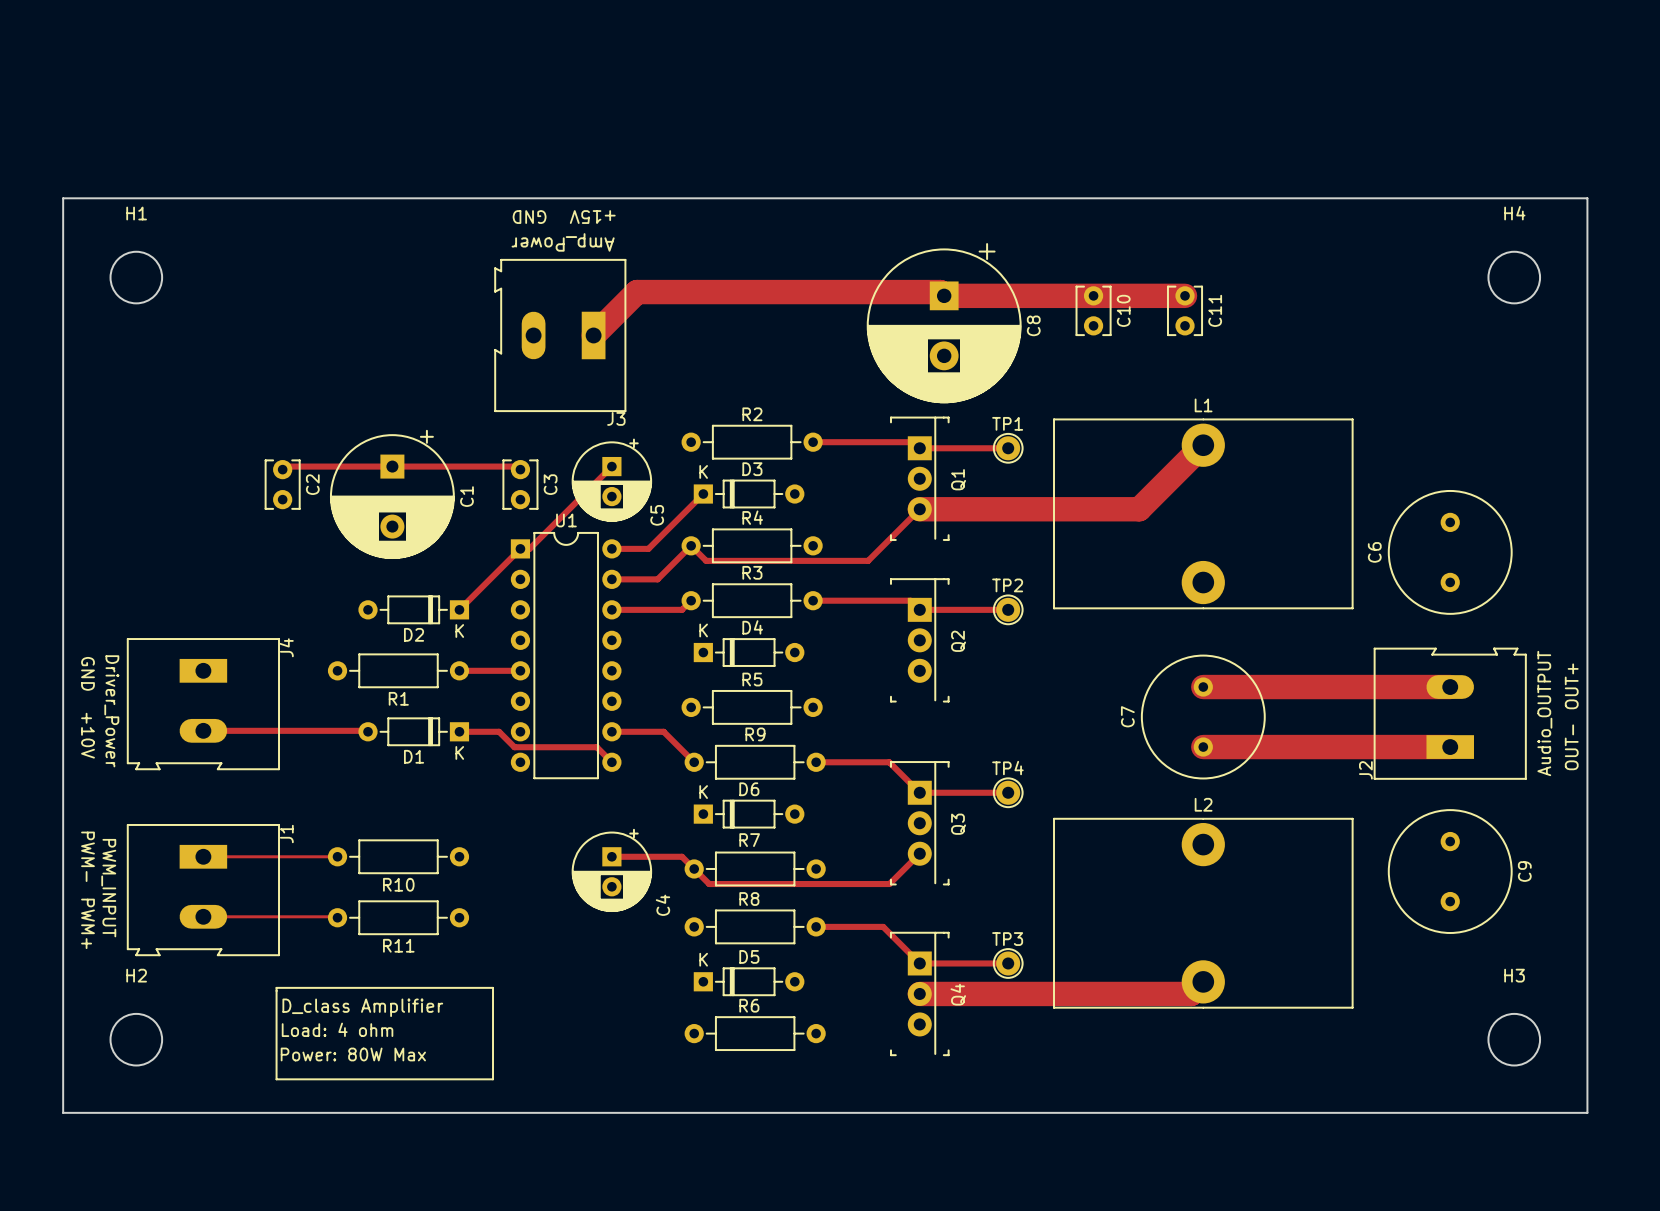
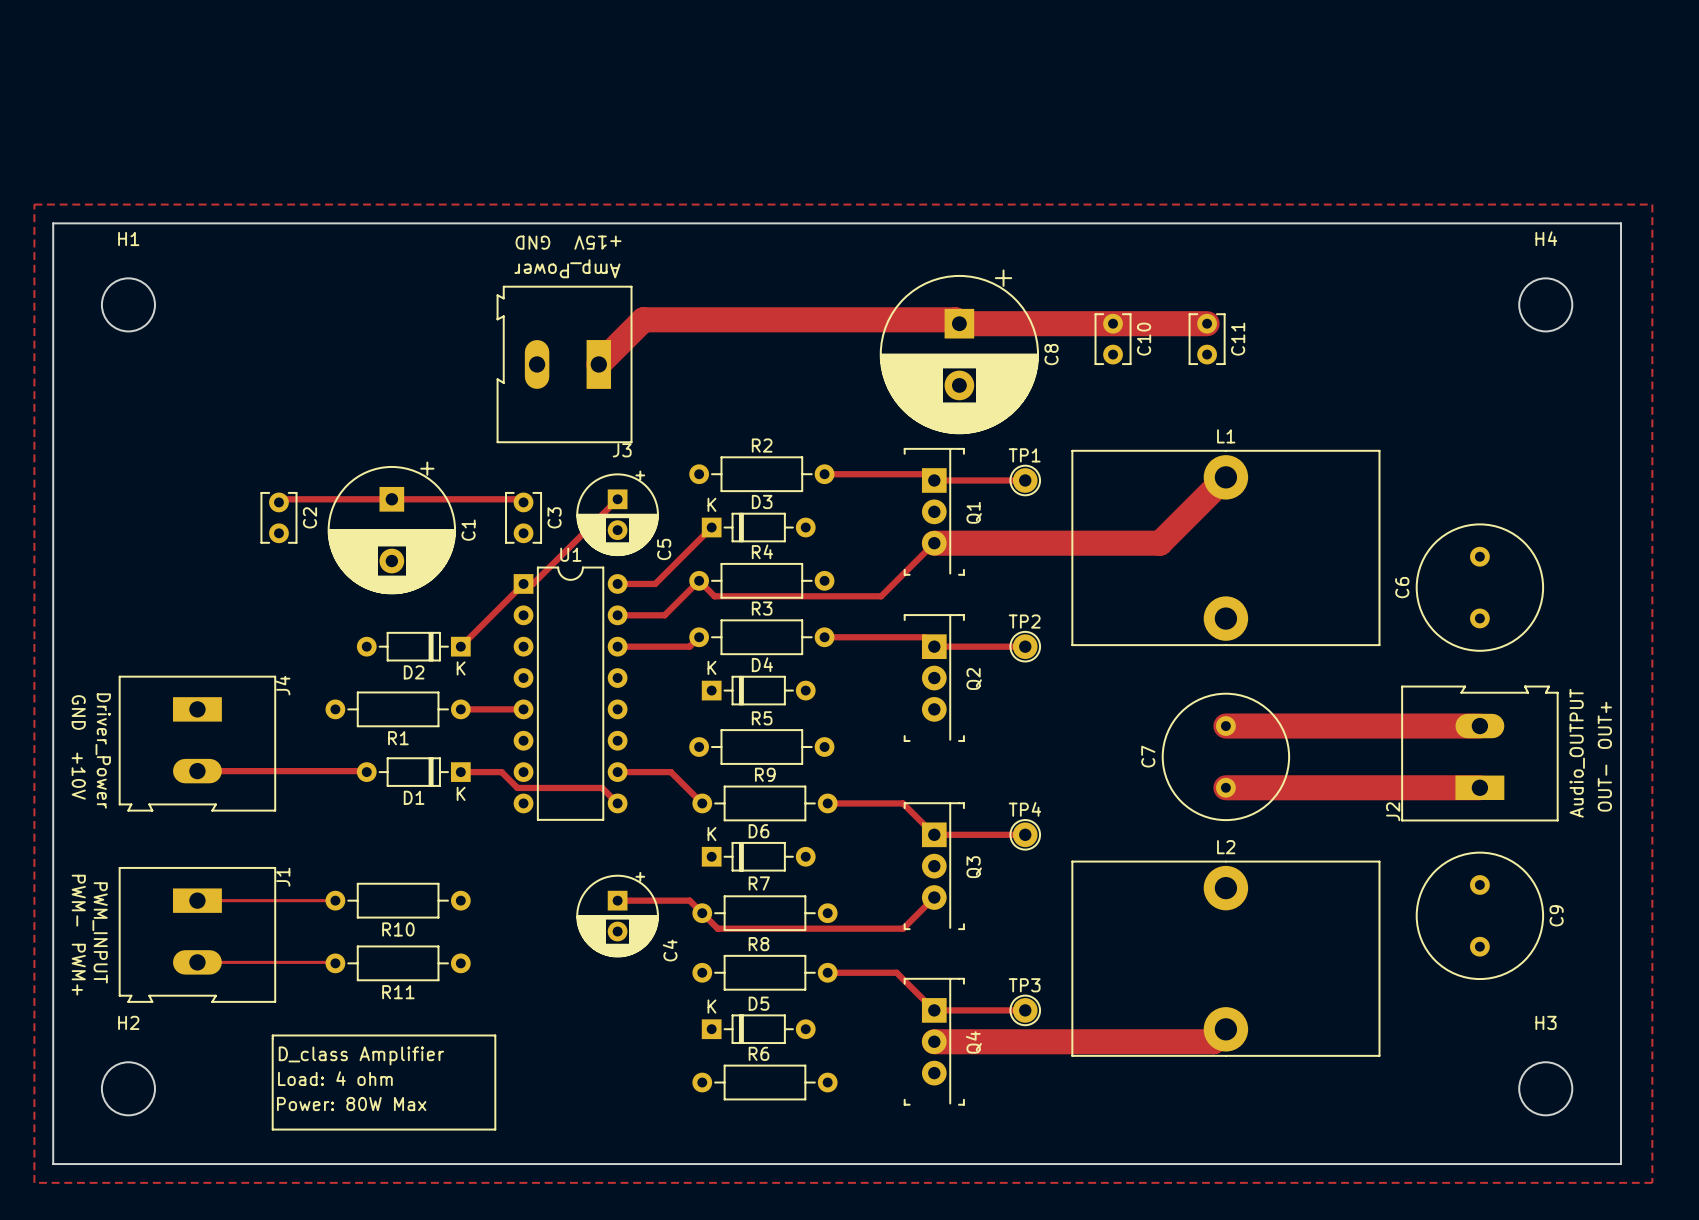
zone outline: none -> (34, 204) (34, 1182) (1652, 1182) (1652, 204) (34, 204)

